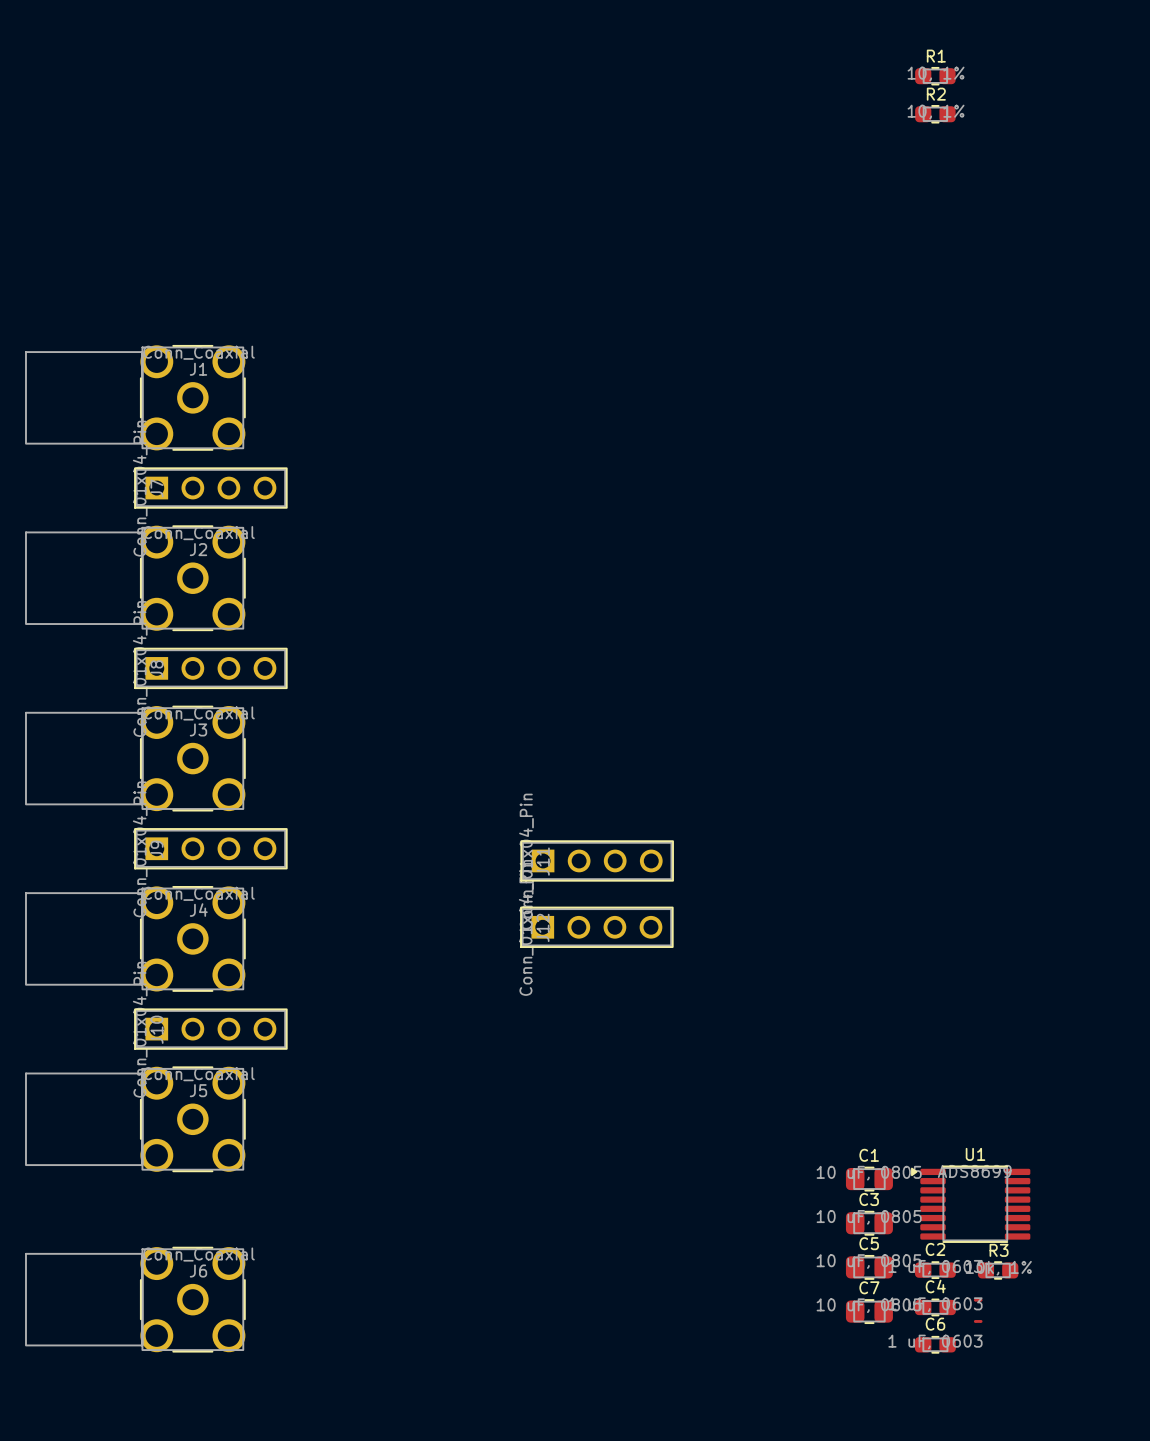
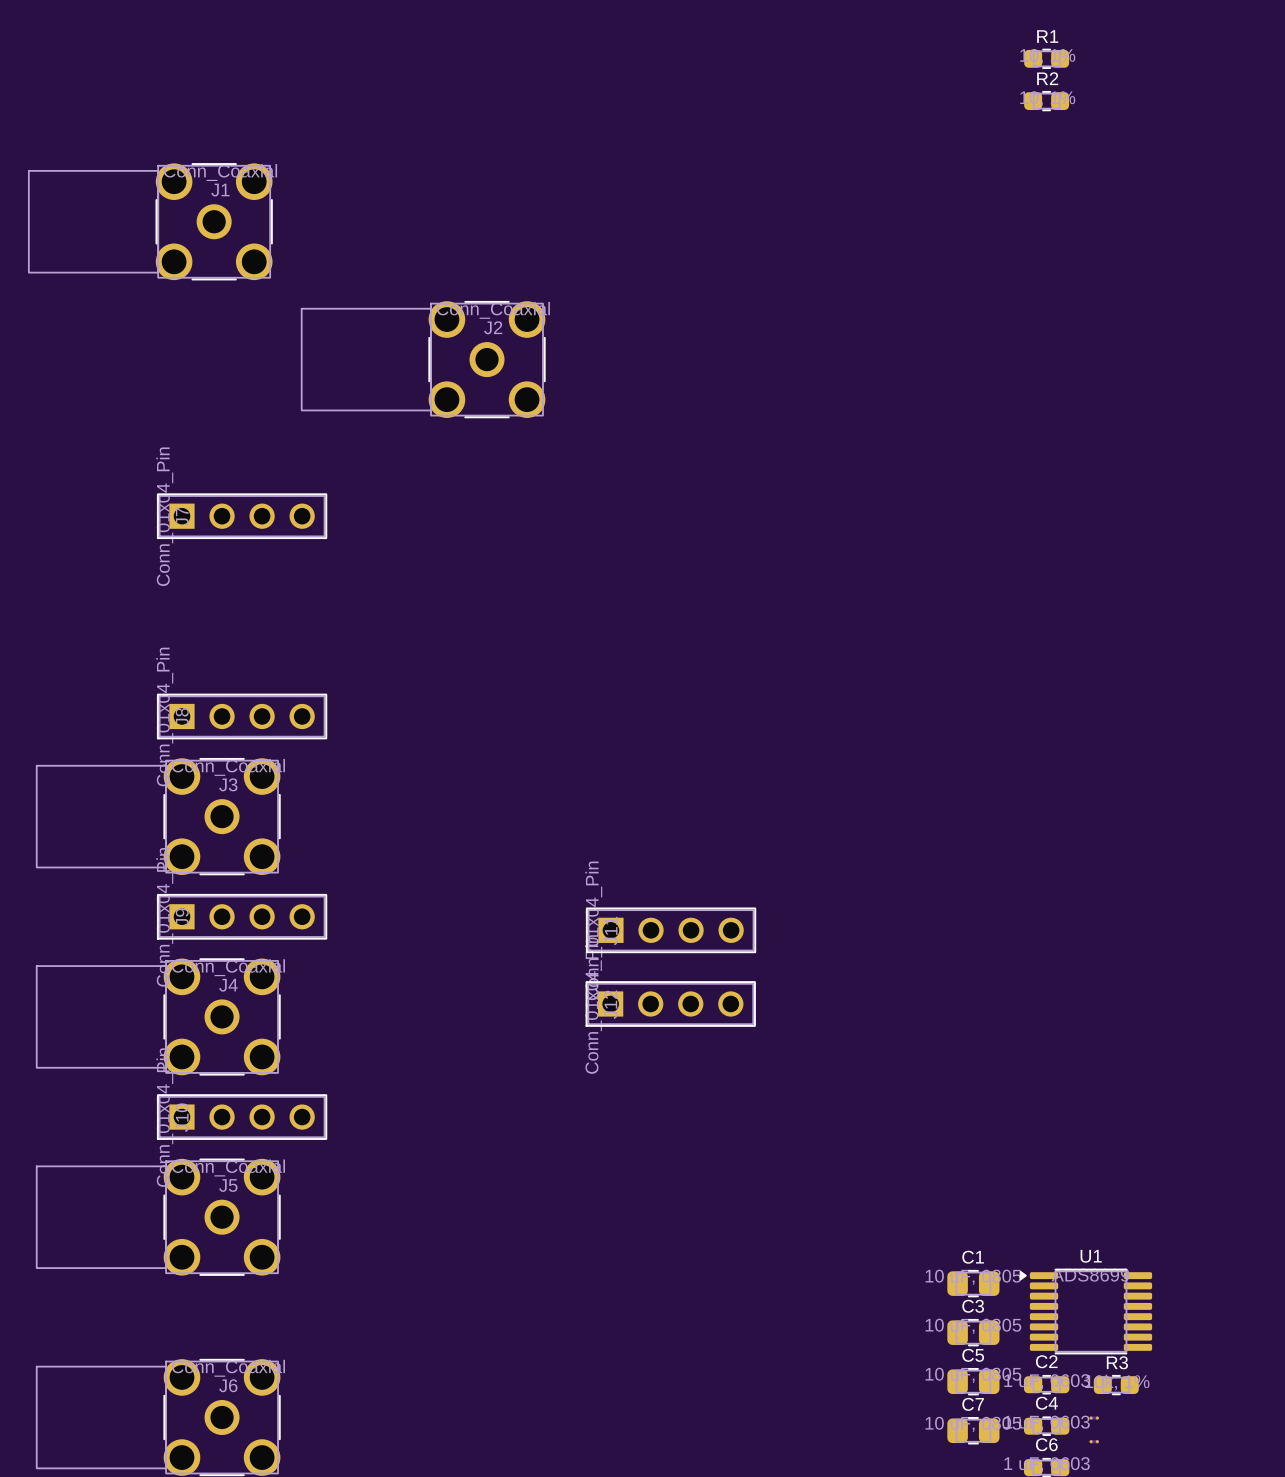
J1 position: (135, 397) -> (150, 221)
J2 position: (135, 578) -> (423, 359)

